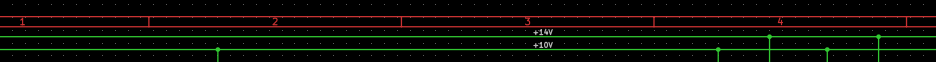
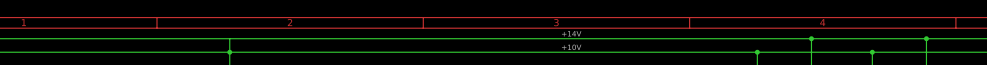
wire: none -> (229, 38) (229, 52)

